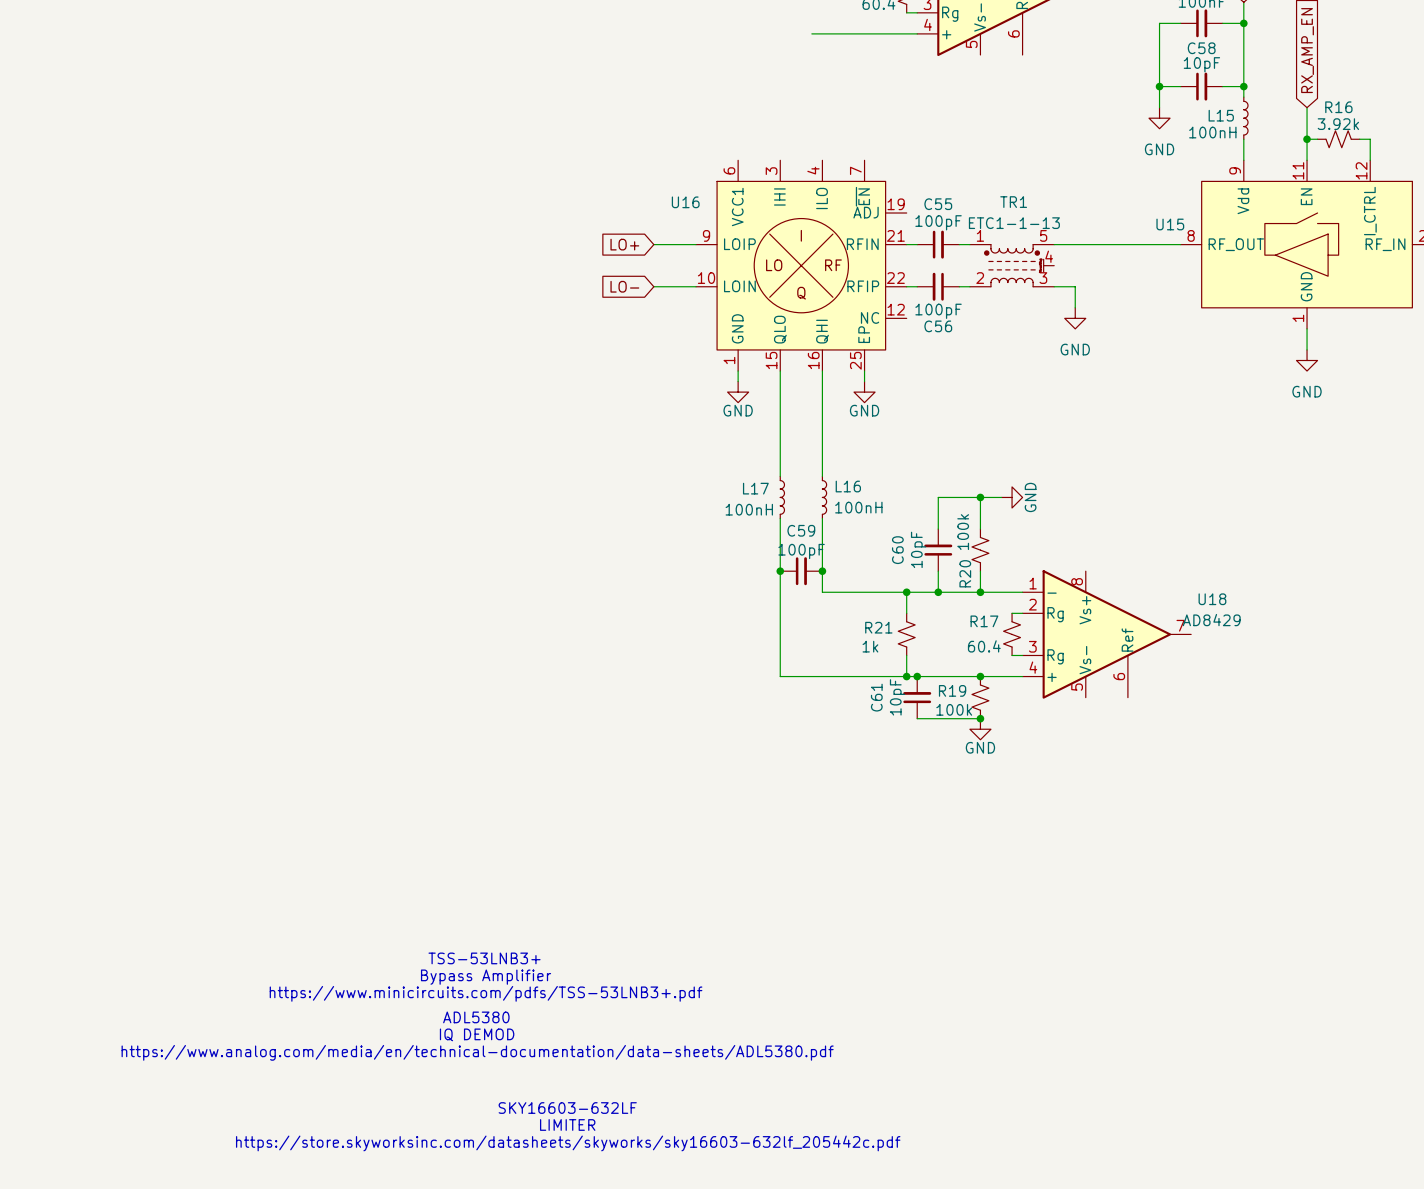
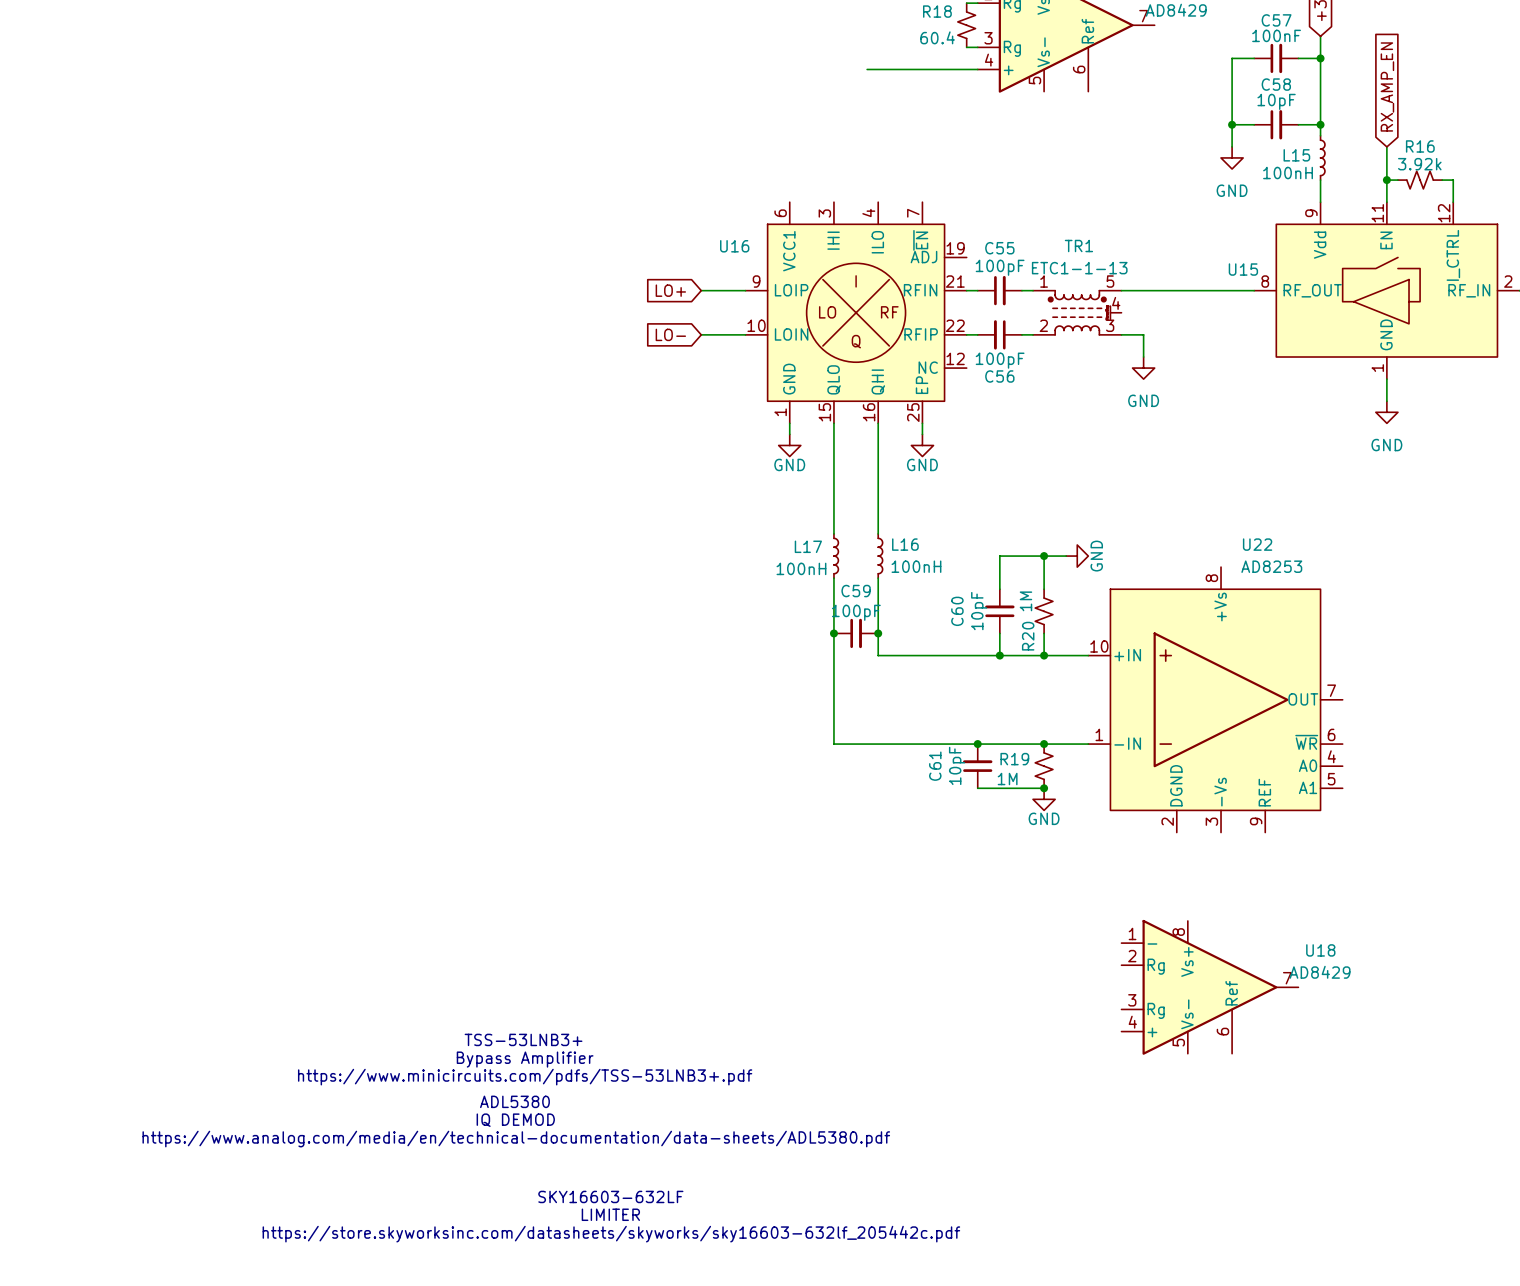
R20 value: 100k (963, 532) -> 1M (1025, 601)
wire: (906, 592) (906, 613) -> none
junction: (906, 592) -> none
wire: (1012, 613) (1022, 613) -> none
R21: 1k (906, 634) -> none
R17: 60.4 (1012, 634) -> none
U18 position: (1106, 634) -> (1209, 987)
U22: none -> AD8253 (1215, 699)
wire: (906, 655) (906, 676) -> none
wire: (1012, 655) (1022, 655) -> none
junction: (906, 676) -> none
R19 value: 100k (954, 709) -> 1M (1007, 779)

